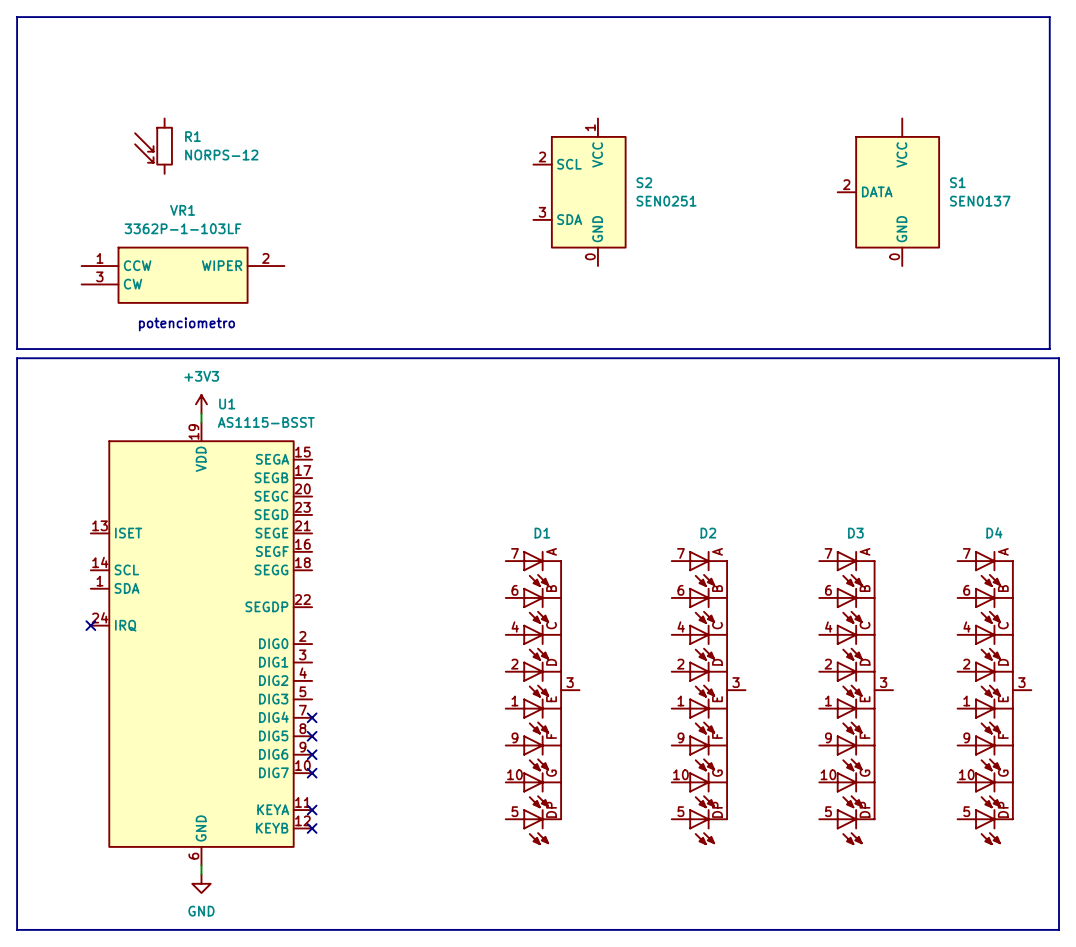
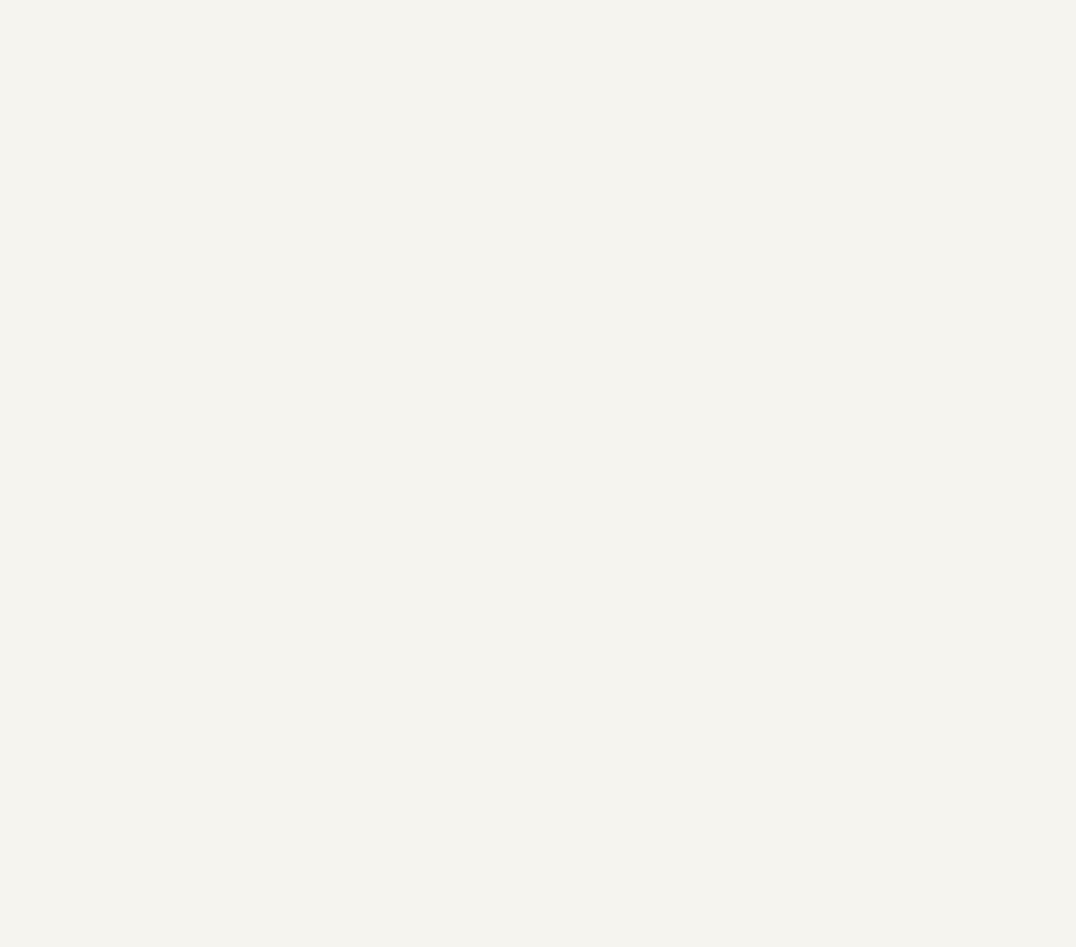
line: (17, 17) (1049, 17) (1049, 349) (17, 349) (17, 17) -> none
R1: NORPS-12 (153, 146) -> none
S2: SEN0251 (579, 192) -> none
S1: SEN0137 (888, 192) -> none
VR1: 3362P-1-103LF (183, 275) -> none
text: potenciometro (186, 324) -> none
line: (17, 358) (17, 929) (1059, 929) (1059, 358) (17, 358) -> none
power symbol: +3V3 (201, 404) -> none
wire: (201, 413) (201, 422) -> none
no-connect mark: (90, 625) -> none
U1: AS1115-BSST (201, 644) -> none
D1: (542, 698) -> none
D2: (708, 698) -> none
D3: (856, 698) -> none
D4: (994, 698) -> none
no-connect mark: (312, 717) -> none
no-connect mark: (312, 736) -> none
no-connect mark: (312, 754) -> none
no-connect mark: (312, 773) -> none
no-connect mark: (312, 810) -> none
no-connect mark: (312, 828) -> none
wire: (201, 865) (201, 874) -> none
power symbol: GND (201, 883) -> none

